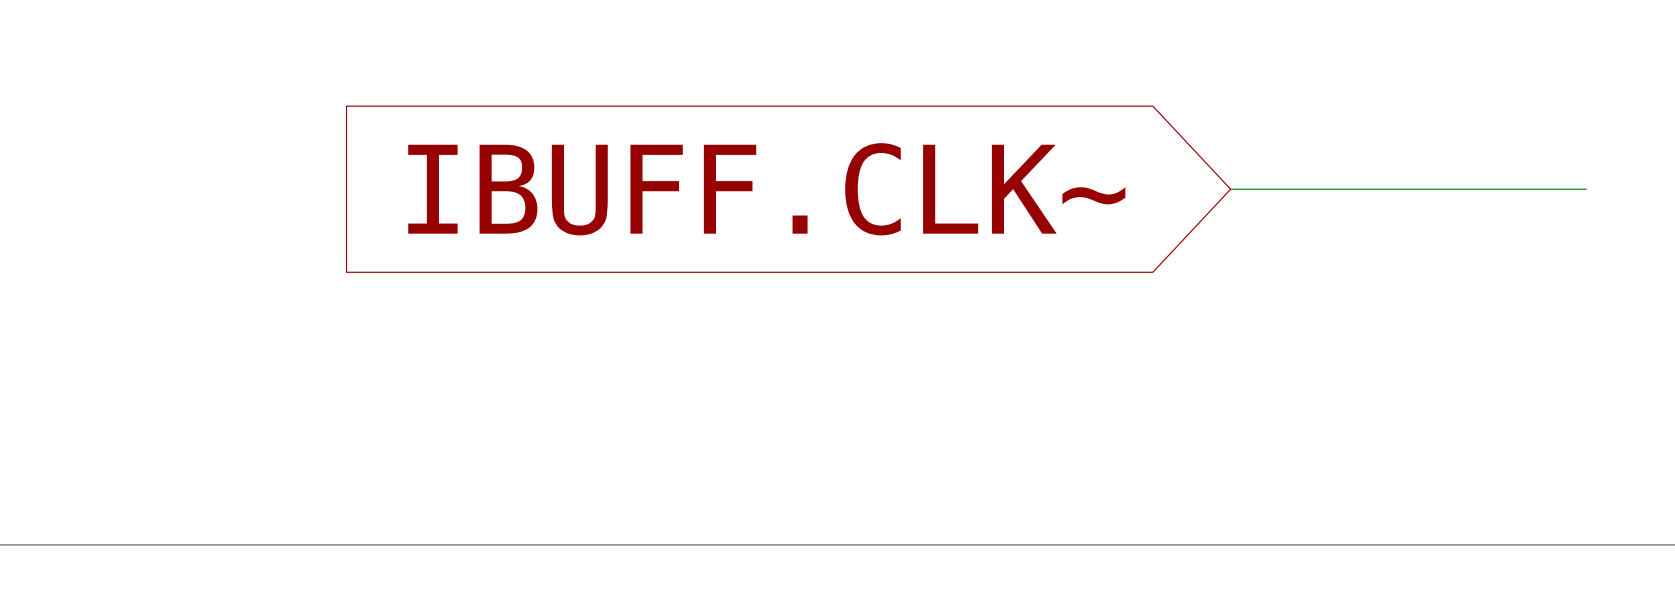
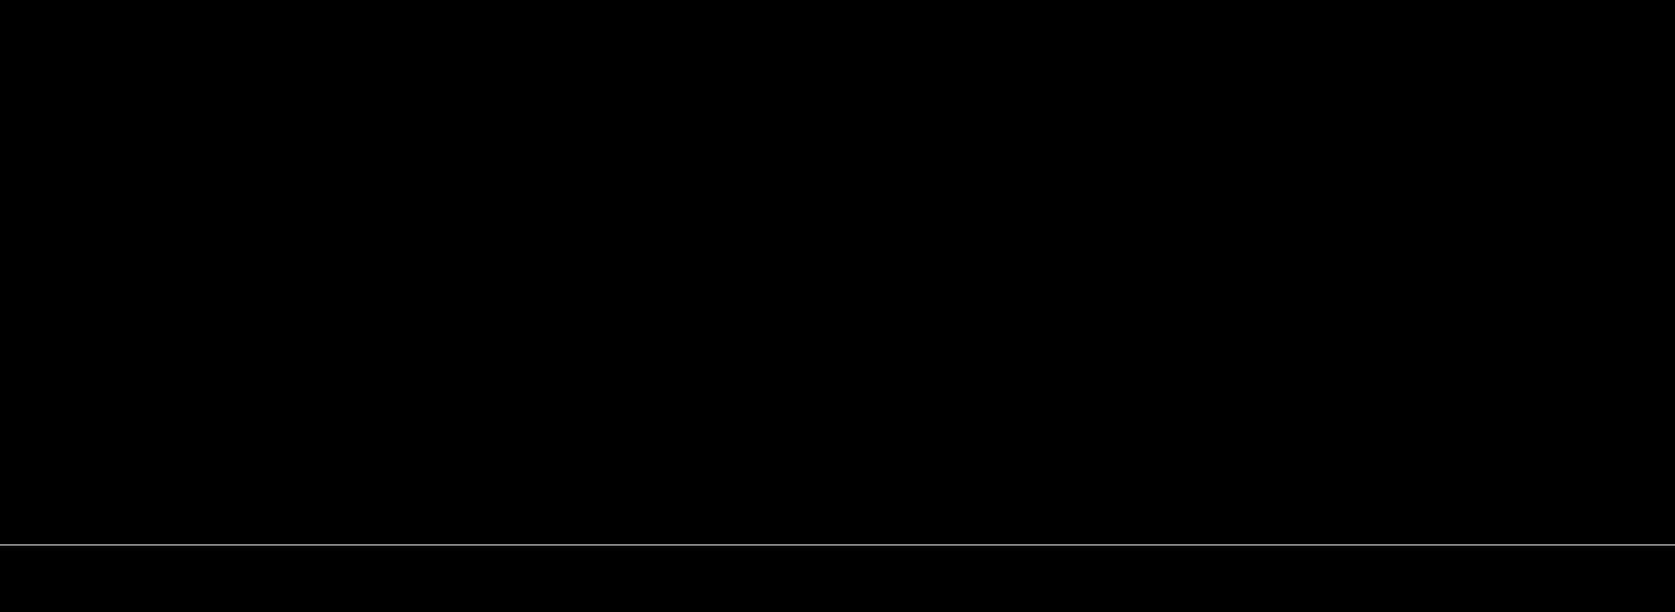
global label: IBUFF.CLK~ (766, 189) -> none
wire: (1230, 189) (1586, 189) -> none

